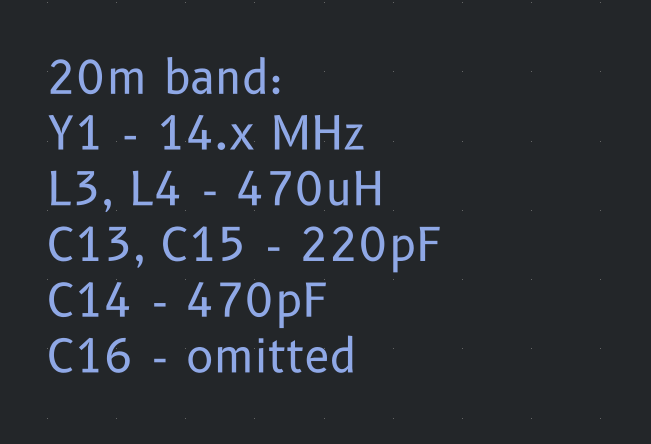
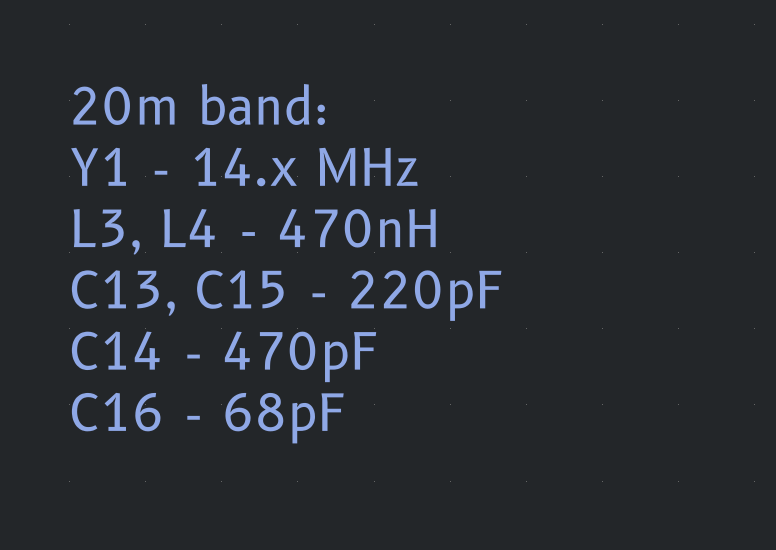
text: L3, L4 - 470uH (215, 191) -> L3, L4 - 470nH (254, 231)
text: C16 - omitted (200, 354) -> C16 - 68pF (207, 418)

